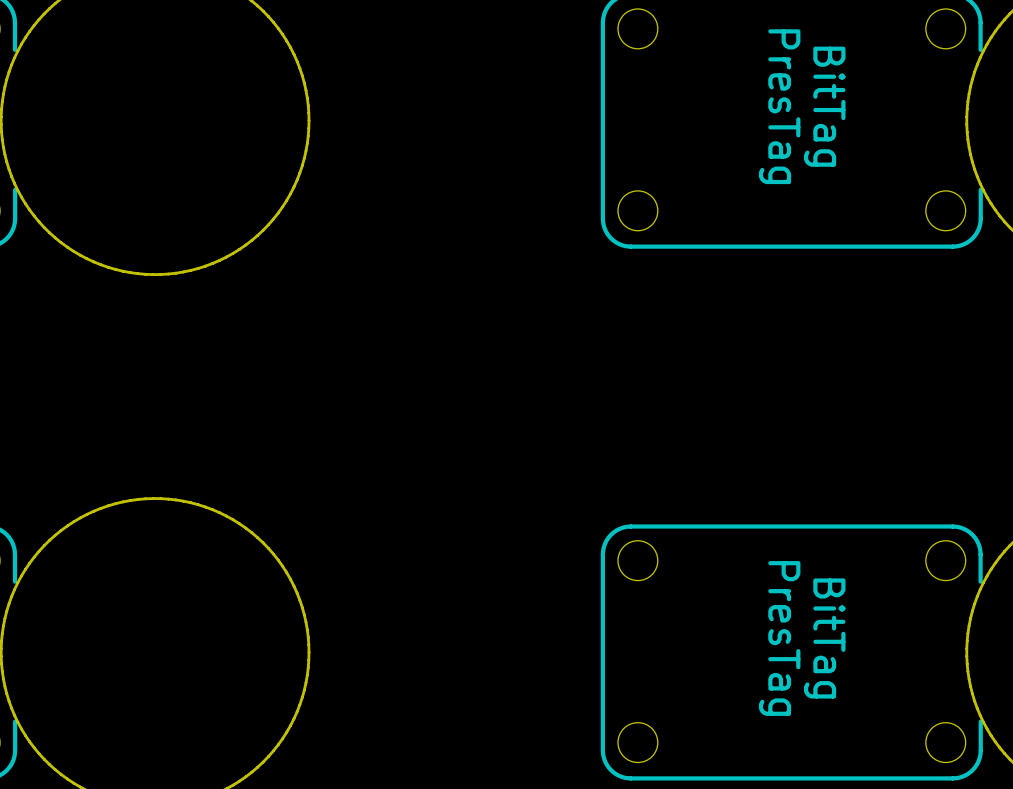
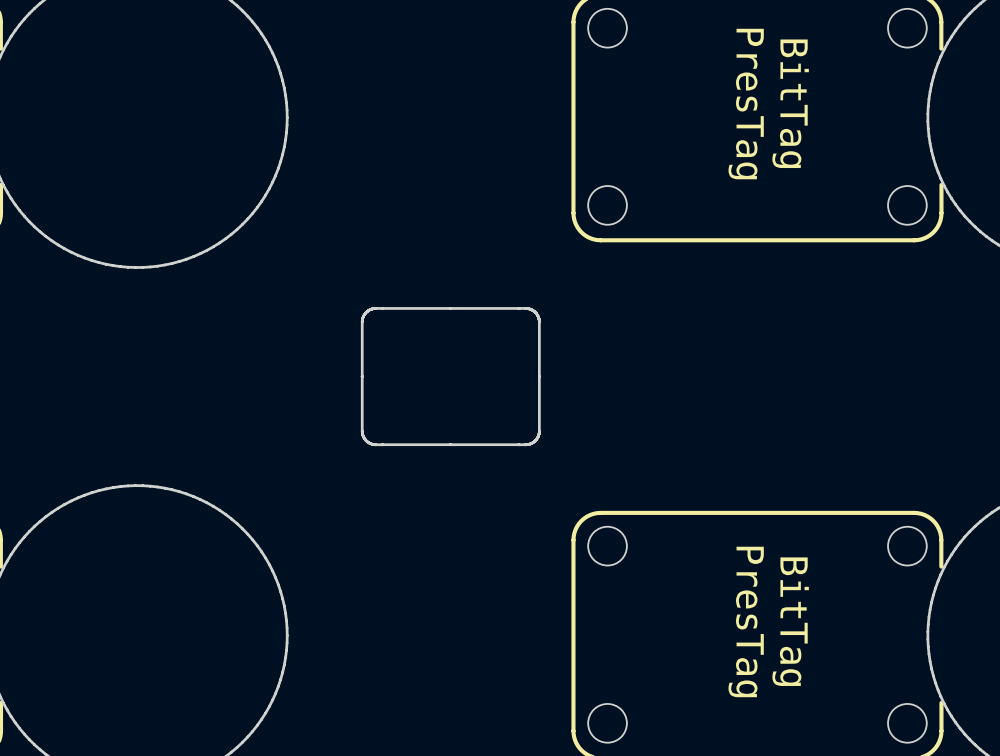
board edge: none -> (375, 308) (525, 308)
board edge: none -> (362, 322) (362, 431)
board edge: none -> (539, 322) (539, 431)
board edge: none -> (375, 444) (525, 444)

